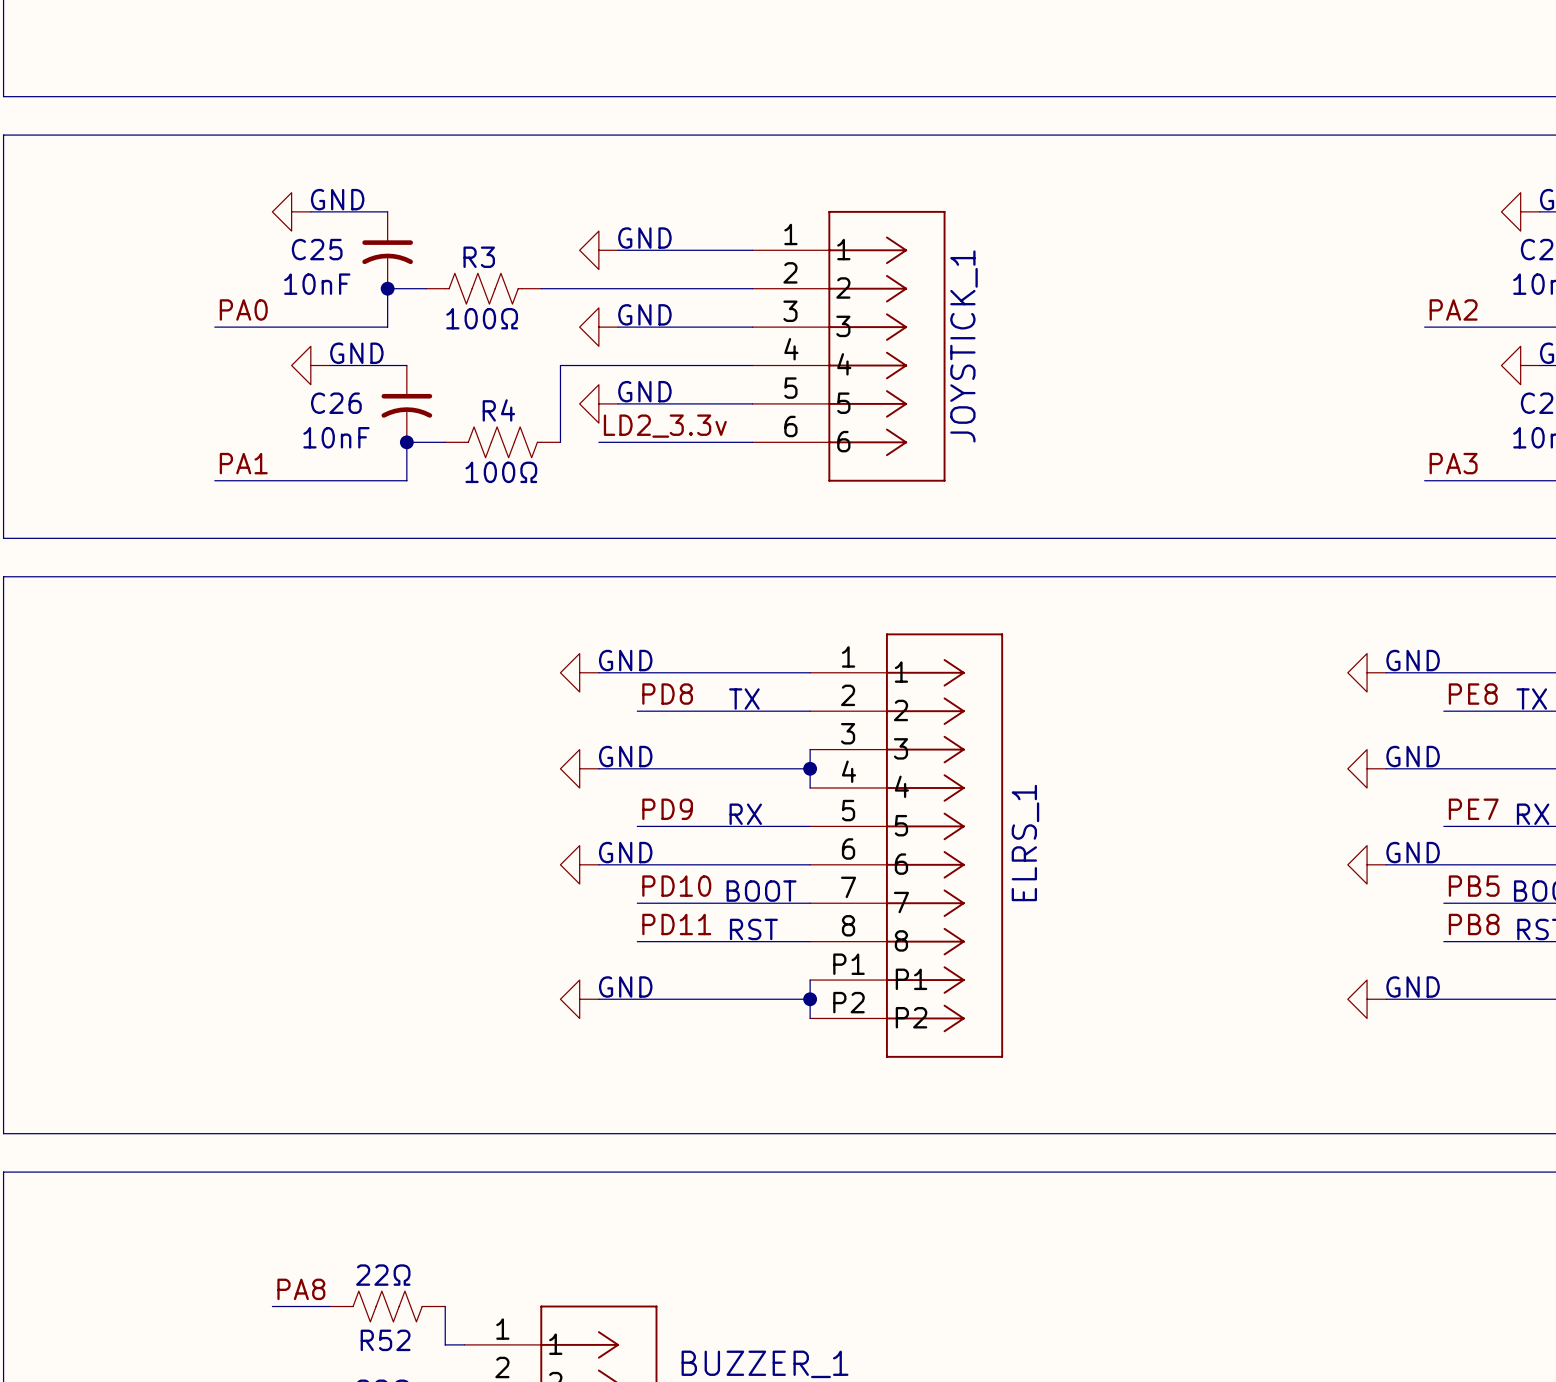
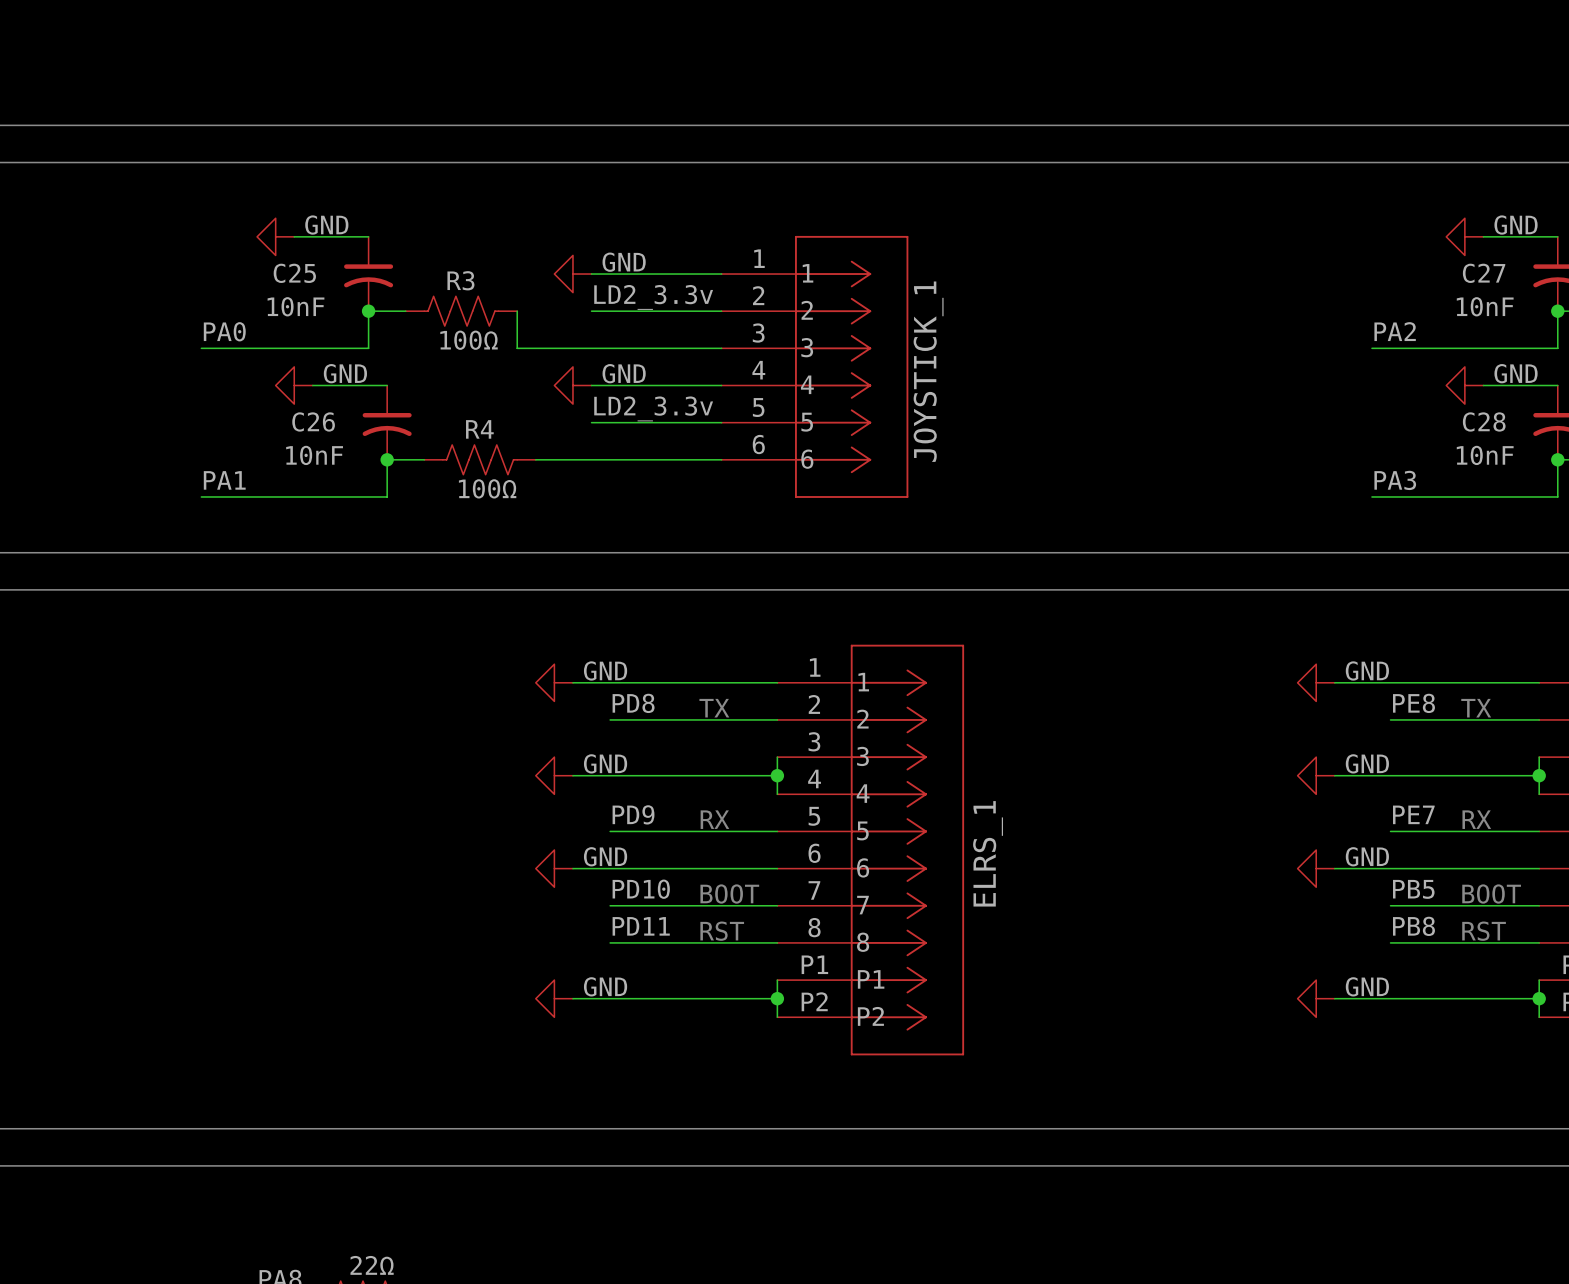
label: none -> LD2_3.3v (653, 297)
wire: (541, 288) (618, 288) -> (517, 311) (517, 348) (591, 348)
power symbol: GND (598, 327) -> none
power symbol: none -> GND (572, 385)
wire: (618, 365) (560, 365) (560, 442) -> (572, 459) (535, 459)
power symbol: GND (598, 403) -> none
label position: LD2_3.3v (665, 426) -> LD2_3.3v (653, 408)

